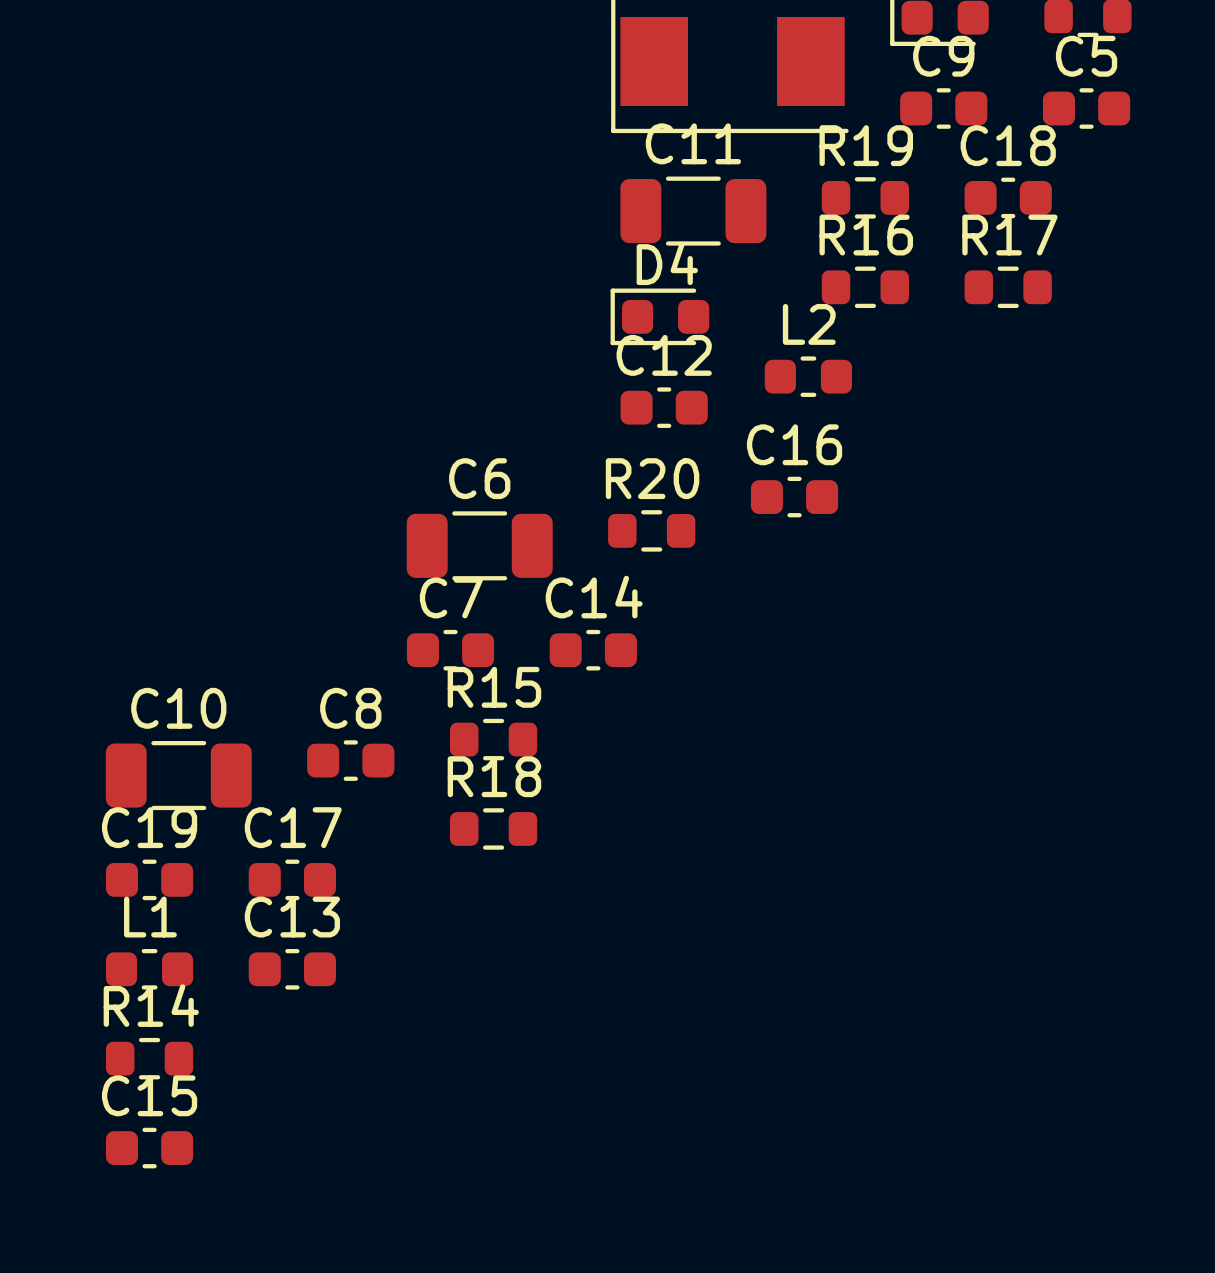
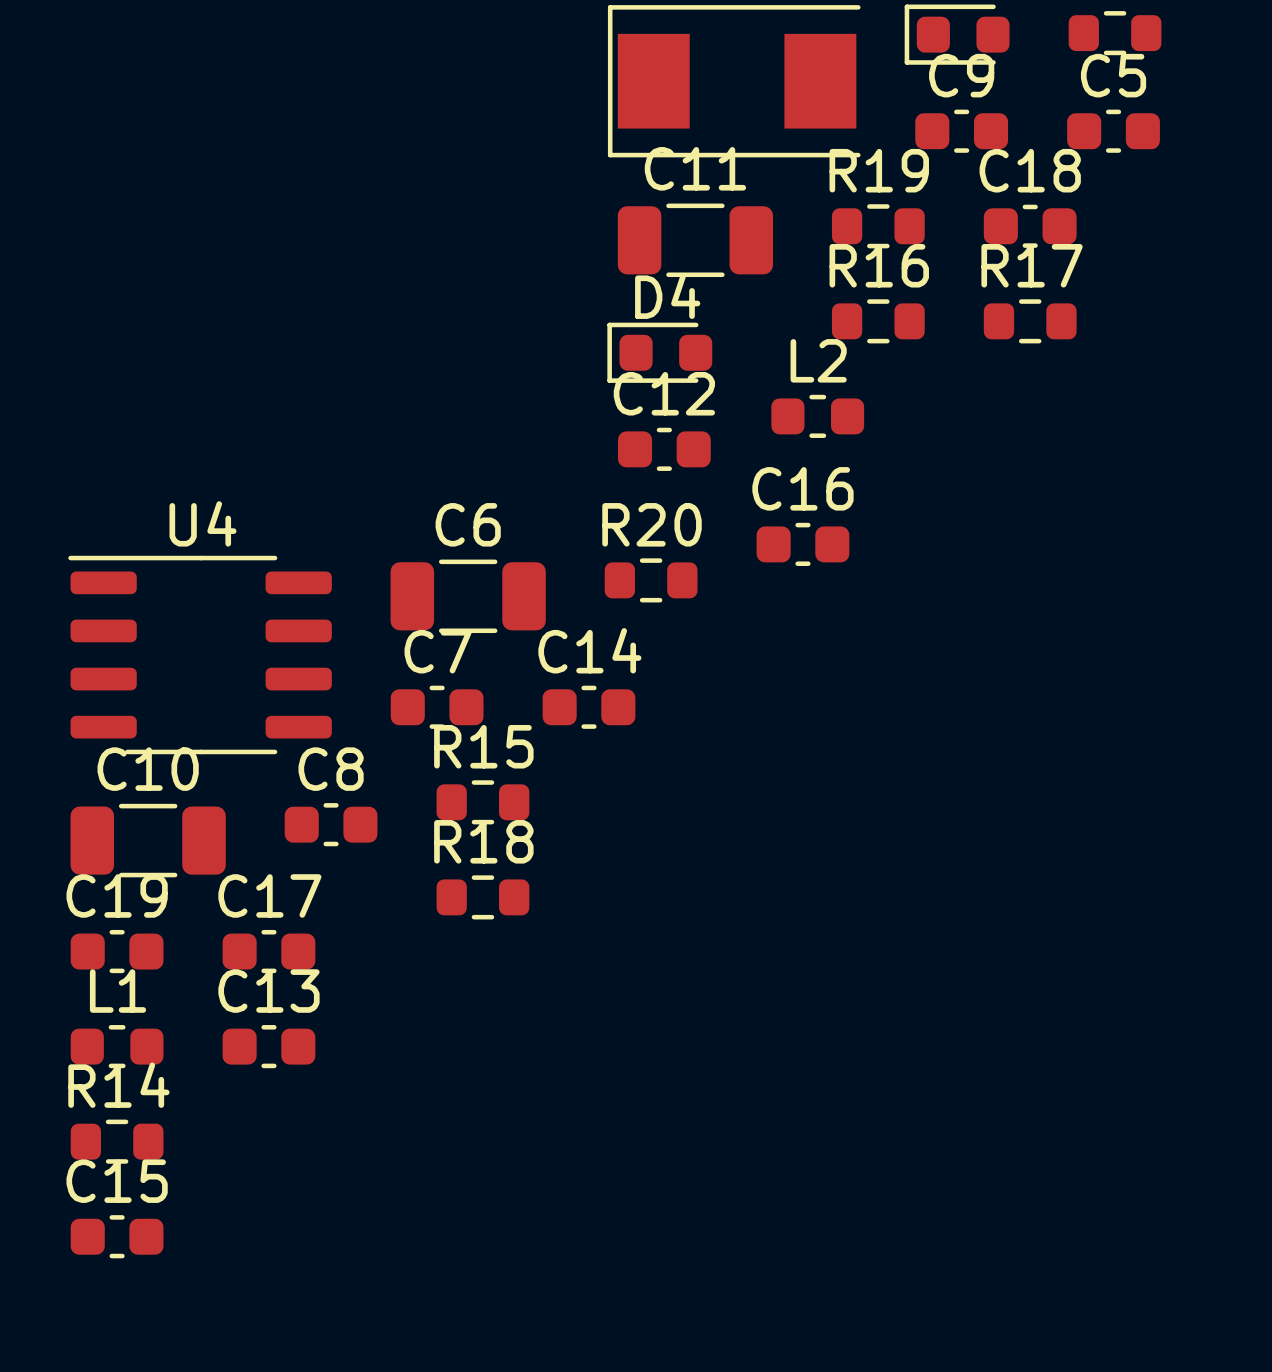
U4: none -> (200, 655)

